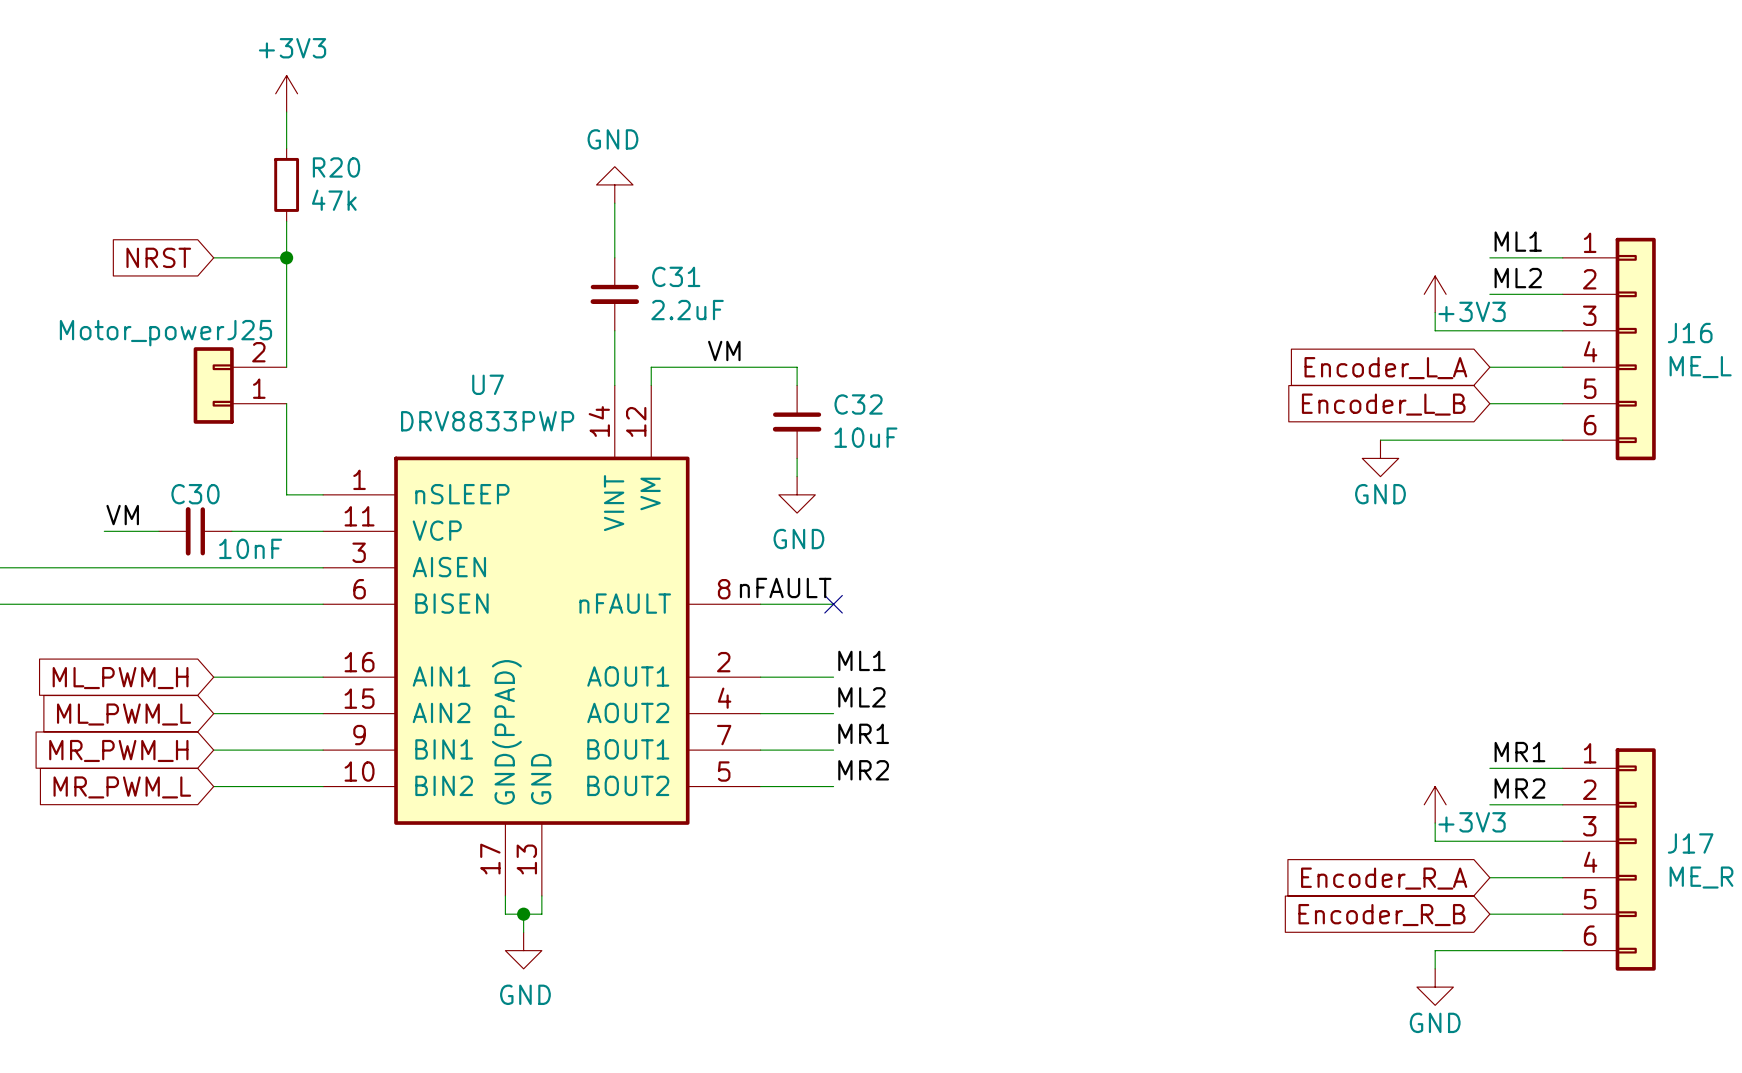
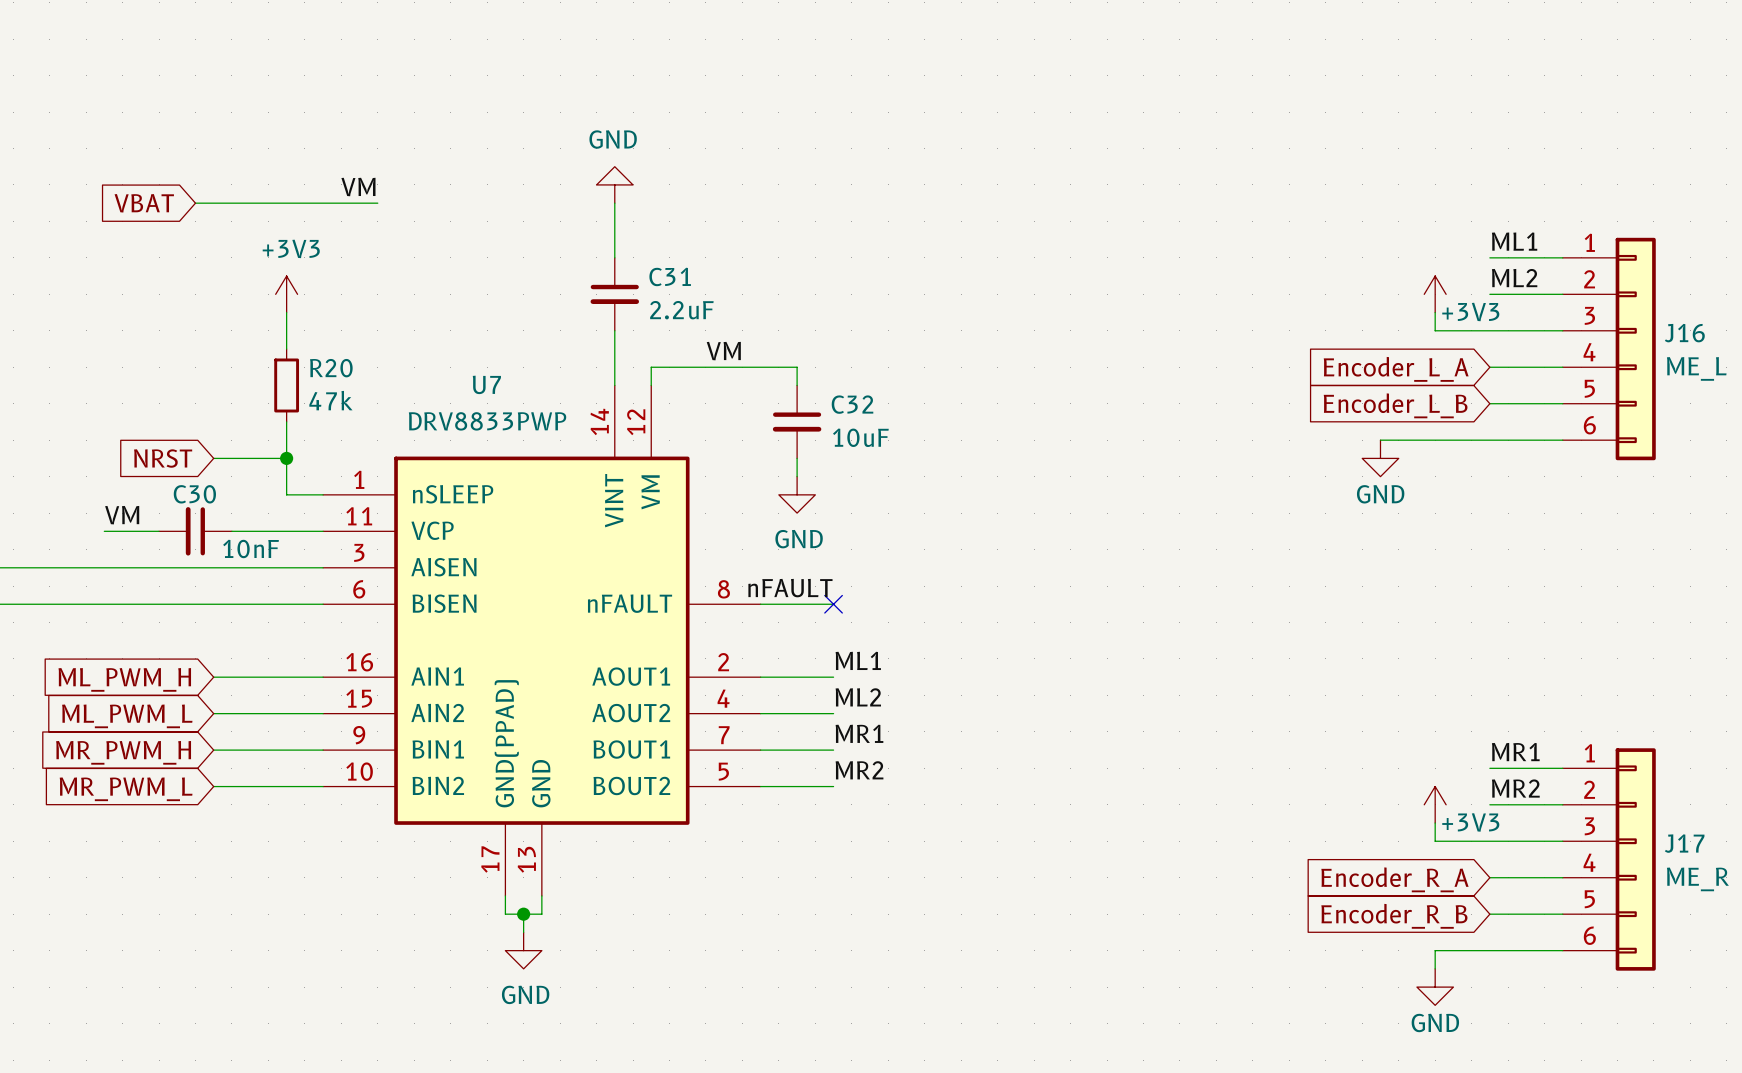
power symbol position: +3V3 (286, 93) -> +3V3 (286, 294)
wire: (286, 112) (286, 148) -> none
R20 position: (286, 184) -> (286, 385)
label: none -> VM (358, 187)
global label: none -> VBAT (144, 203)
wire: none -> (195, 203) (377, 203)
wire: (286, 221) (286, 312) -> none
global label position: NRST (158, 257) -> NRST (163, 458)
wire: (213, 257) (286, 257) -> (213, 458) (286, 458)
junction: (286, 257) -> none
J25: Motor_power (240, 385) -> none
junction: none -> (286, 458)

